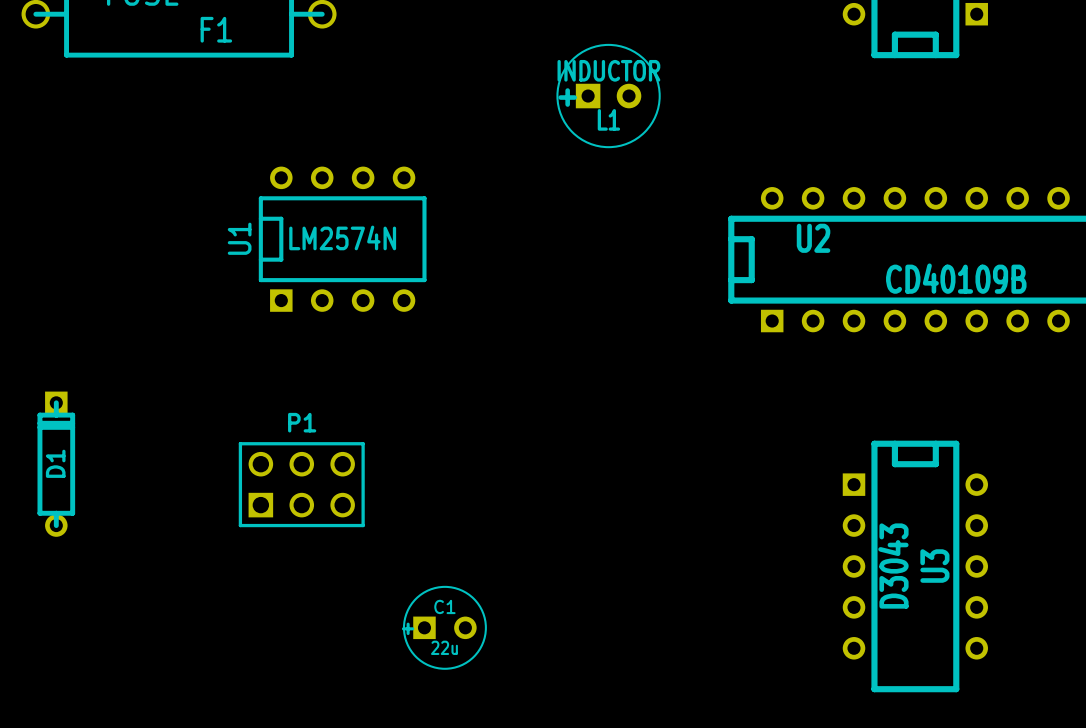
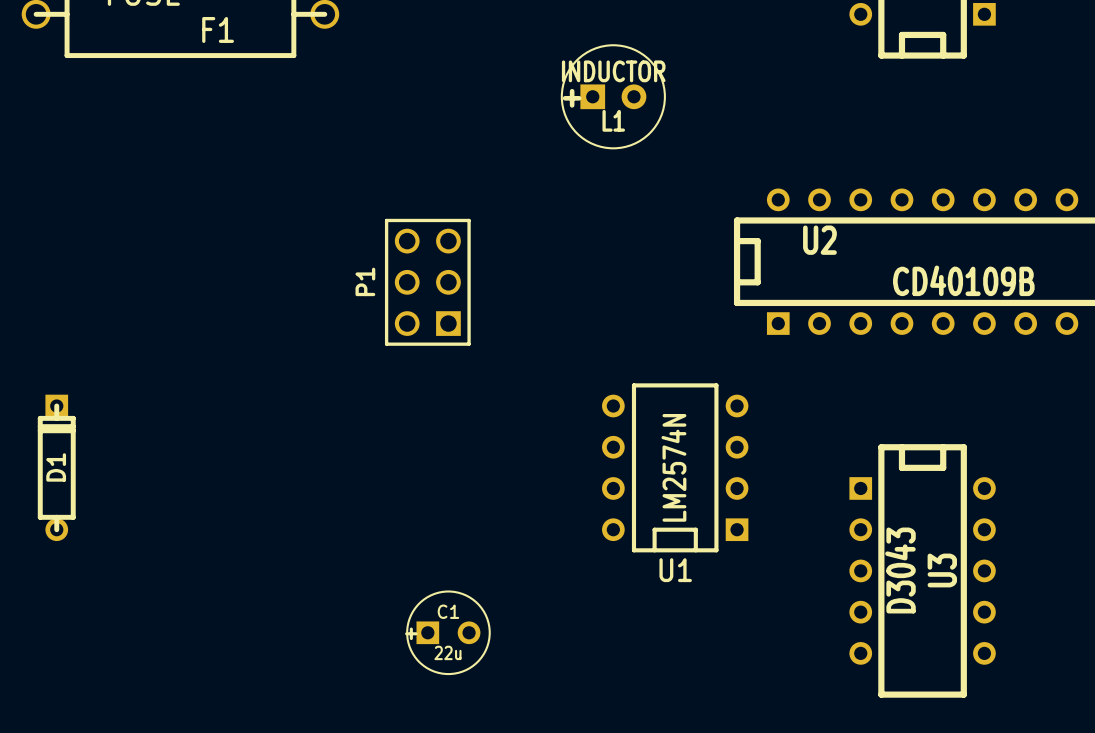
U1 rotation: 0° (342, 239) -> 90° counterclockwise (675, 467)
U1 position: (342, 239) -> (675, 467)
P1 rotation: 0° (301, 484) -> 90° counterclockwise (427, 282)
P1 position: (301, 484) -> (427, 282)

